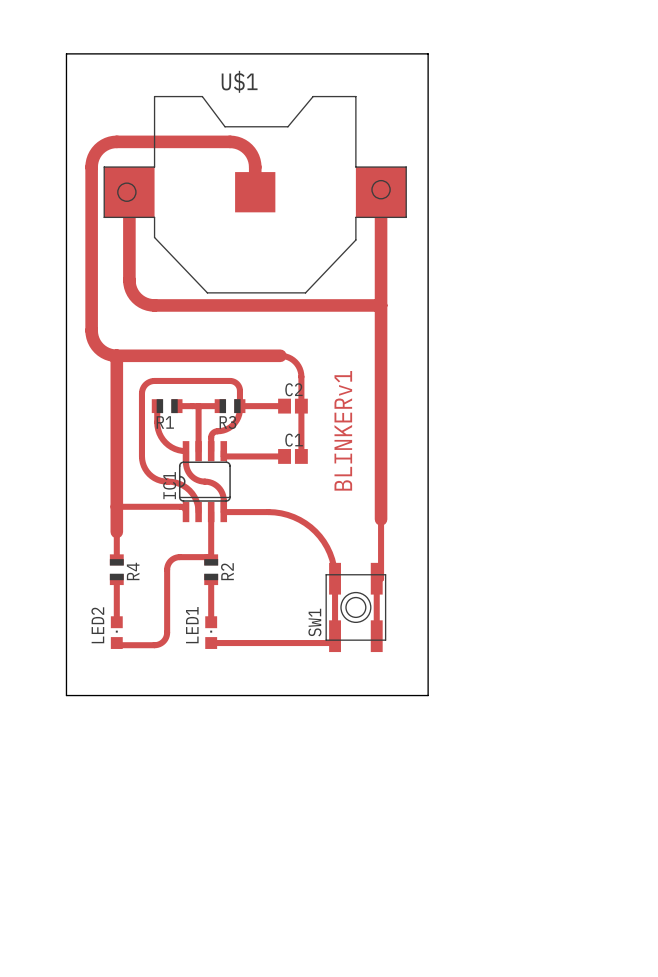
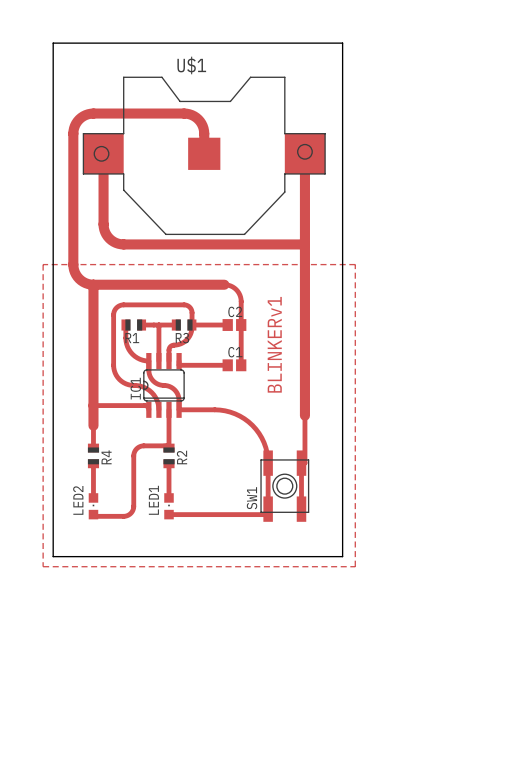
top zone outline: none -> (43, 264) (43, 566) (355, 566) (355, 264) (43, 264)

